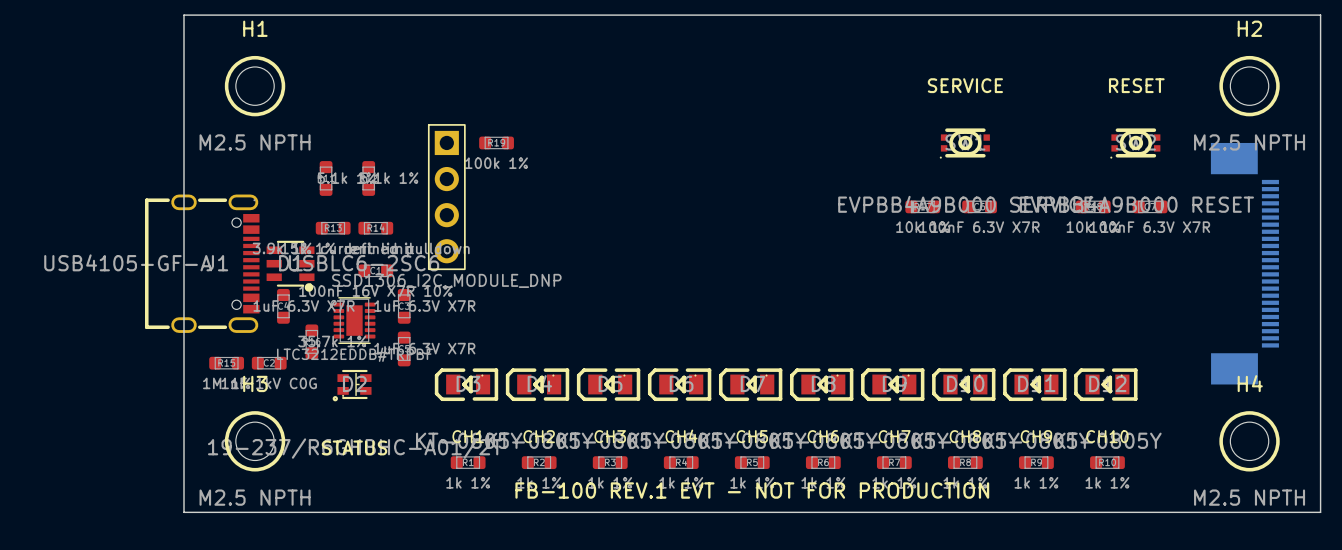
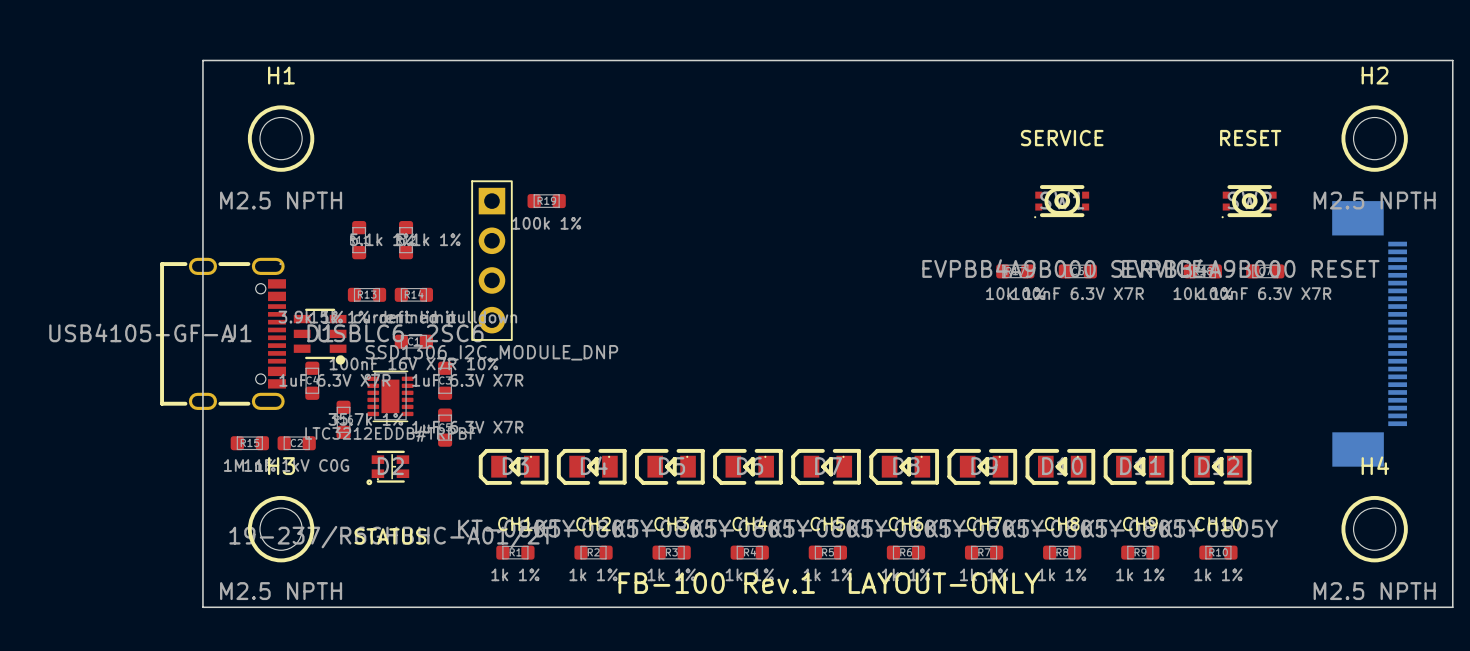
text: FB-100 REV.1 EVT - NOT FOR PRODUCTION (752, 490) -> FB-100 Rev.1 LAYOUT-ONLY (829, 583)

